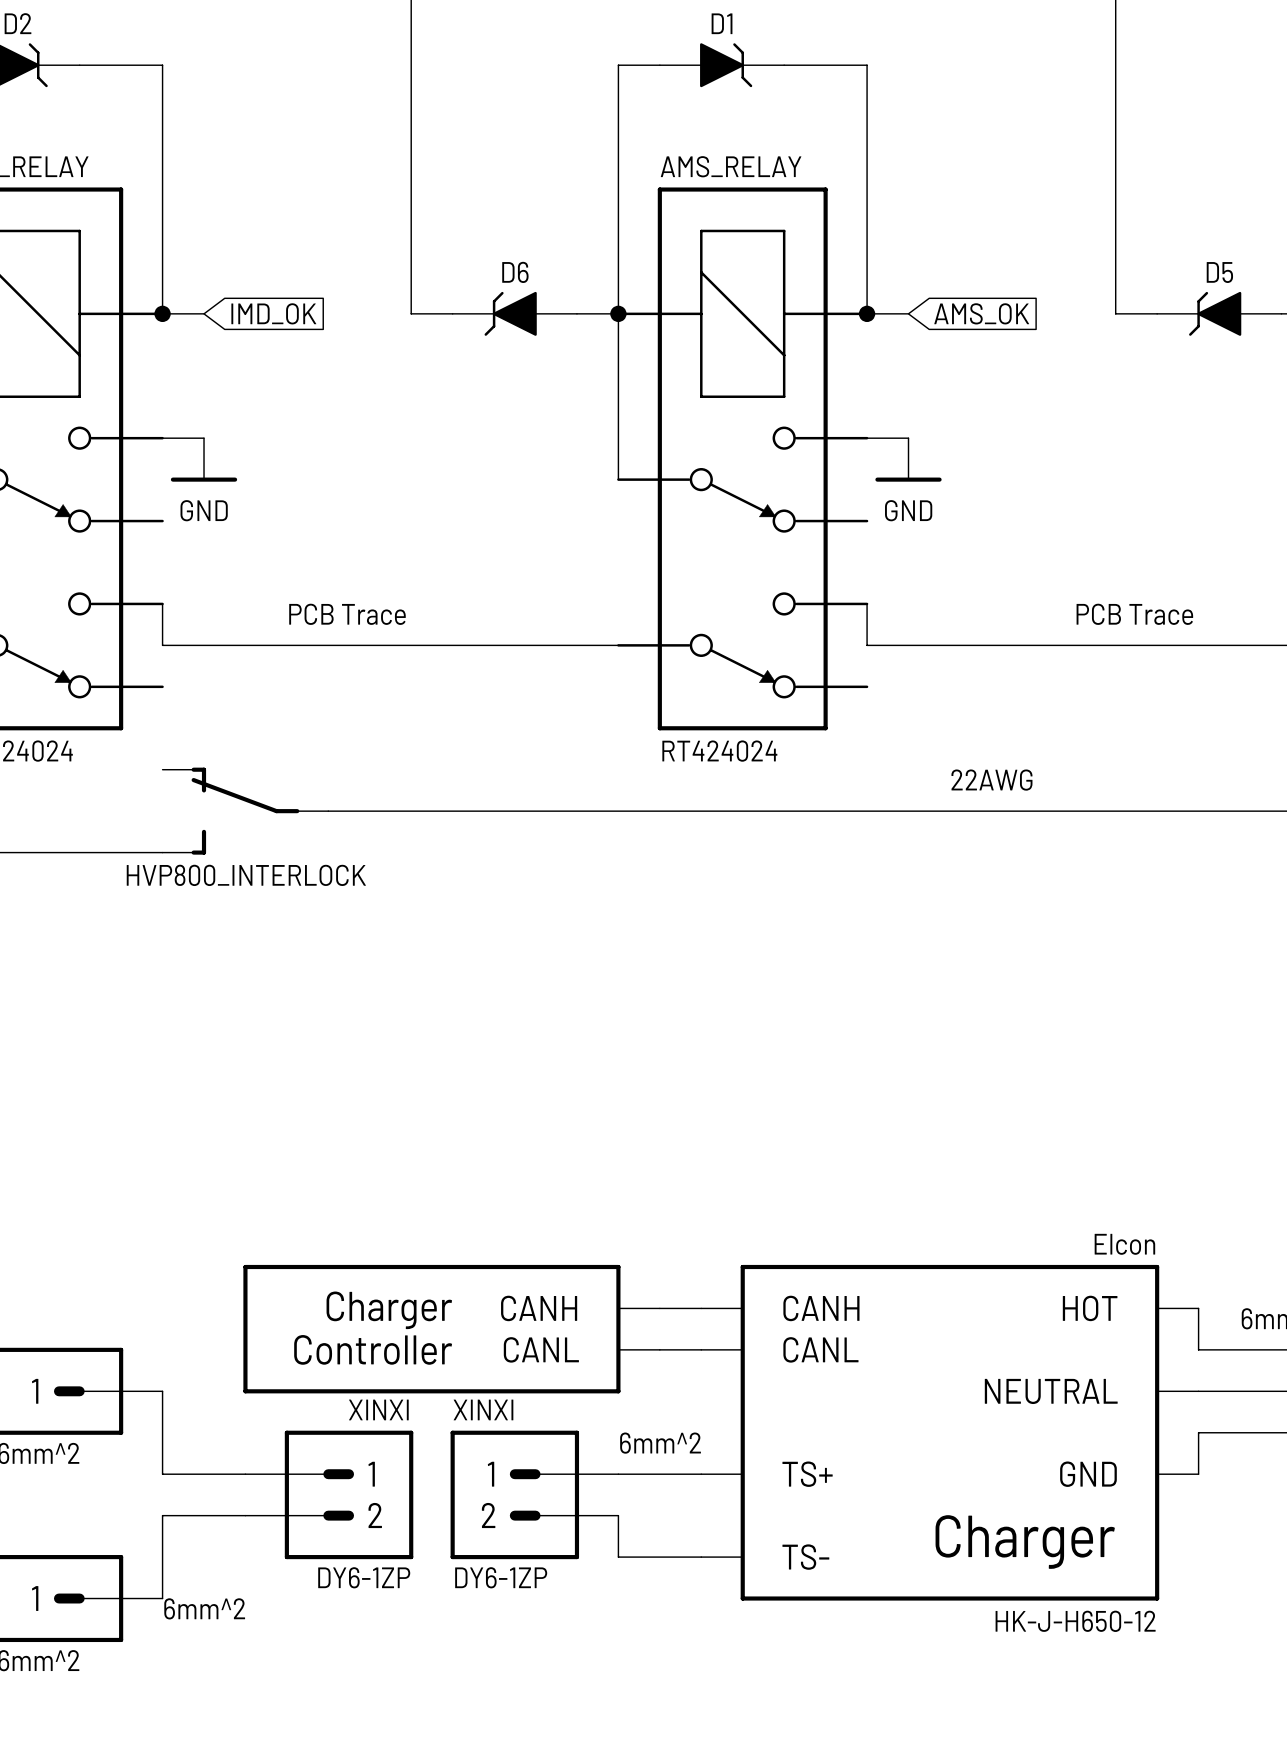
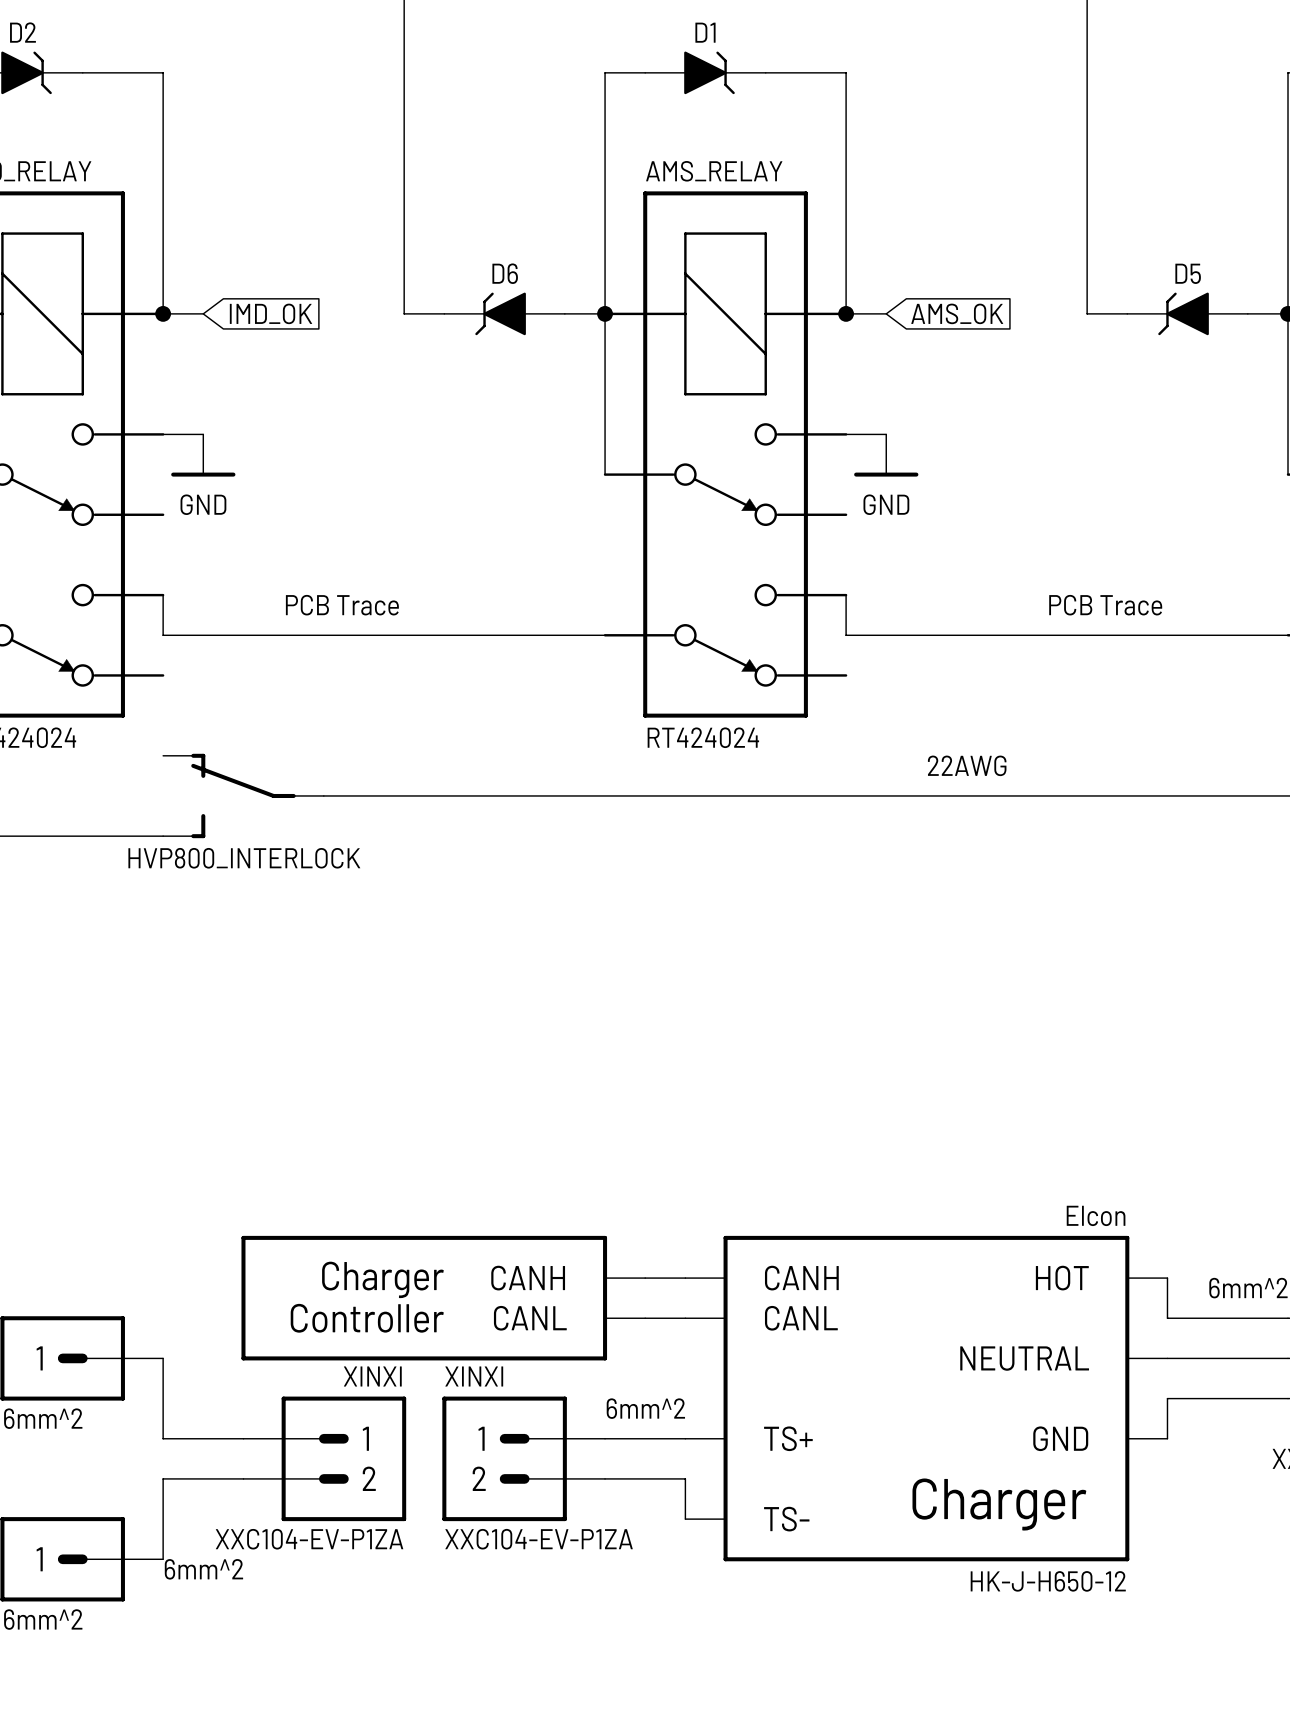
wire: (618, 1515) (618, 1557) (701, 1557) -> (605, 1478) (685, 1478) (685, 1519)
part text: DY6-1ZP (364, 1577) -> XXC104-EV-P1ZA (309, 1539)
part text: DY6-1ZP (501, 1577) -> XXC104-EV-P1ZA (539, 1539)

